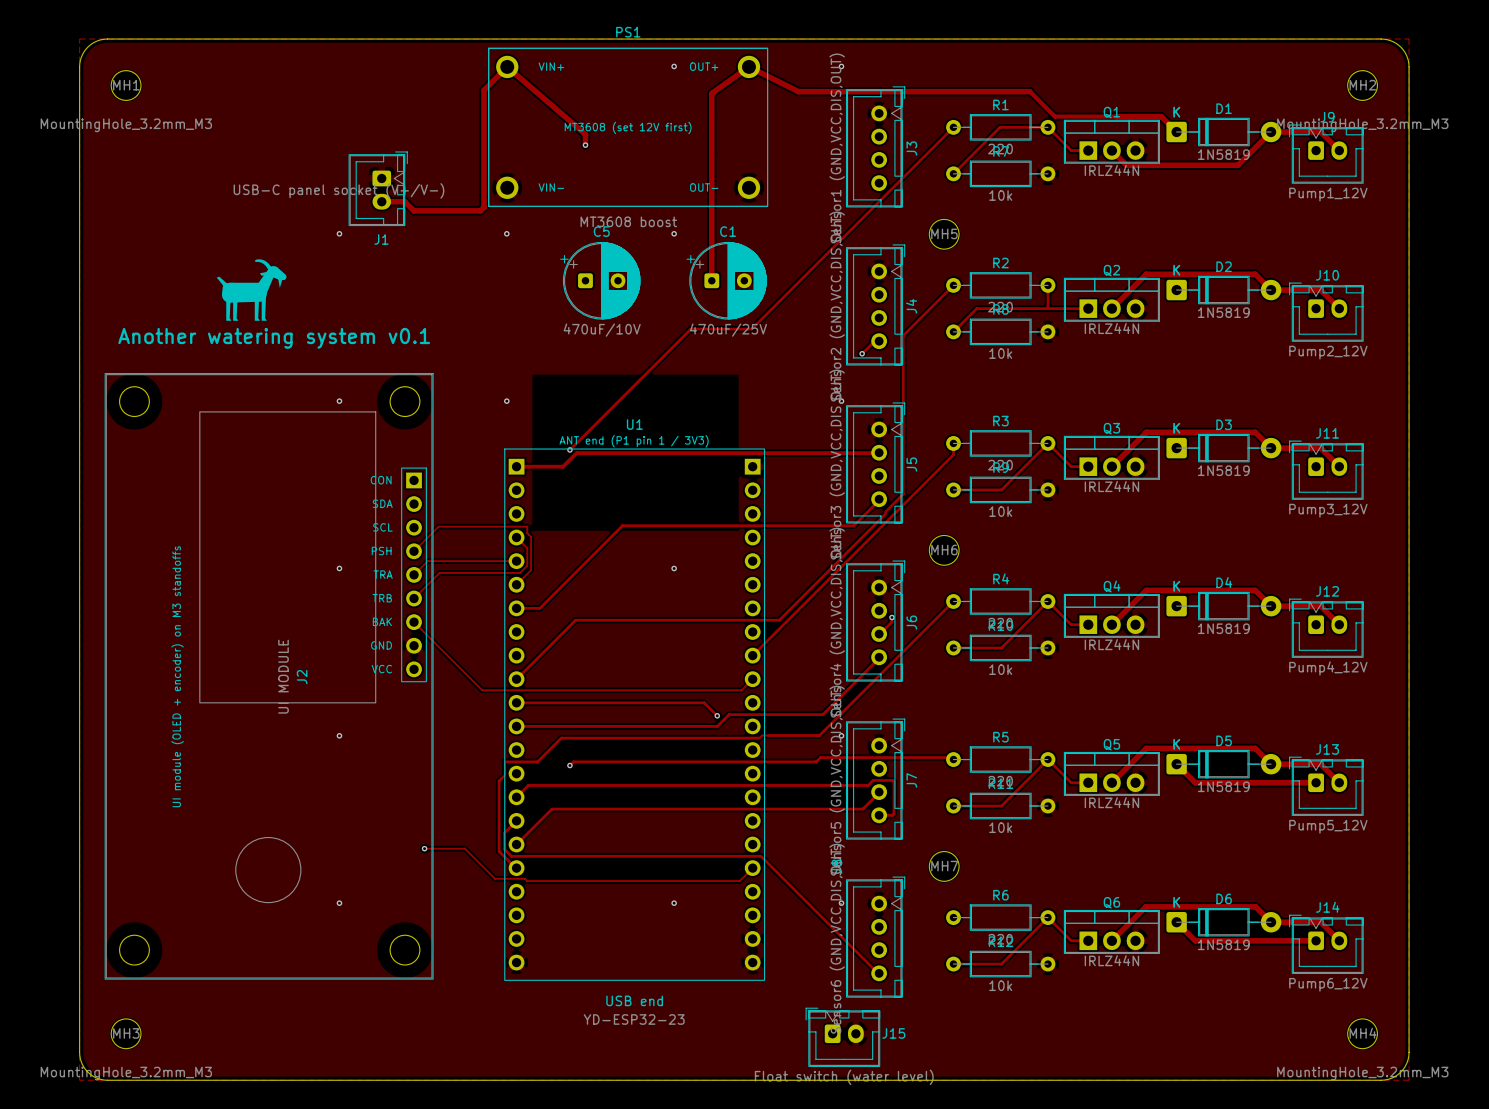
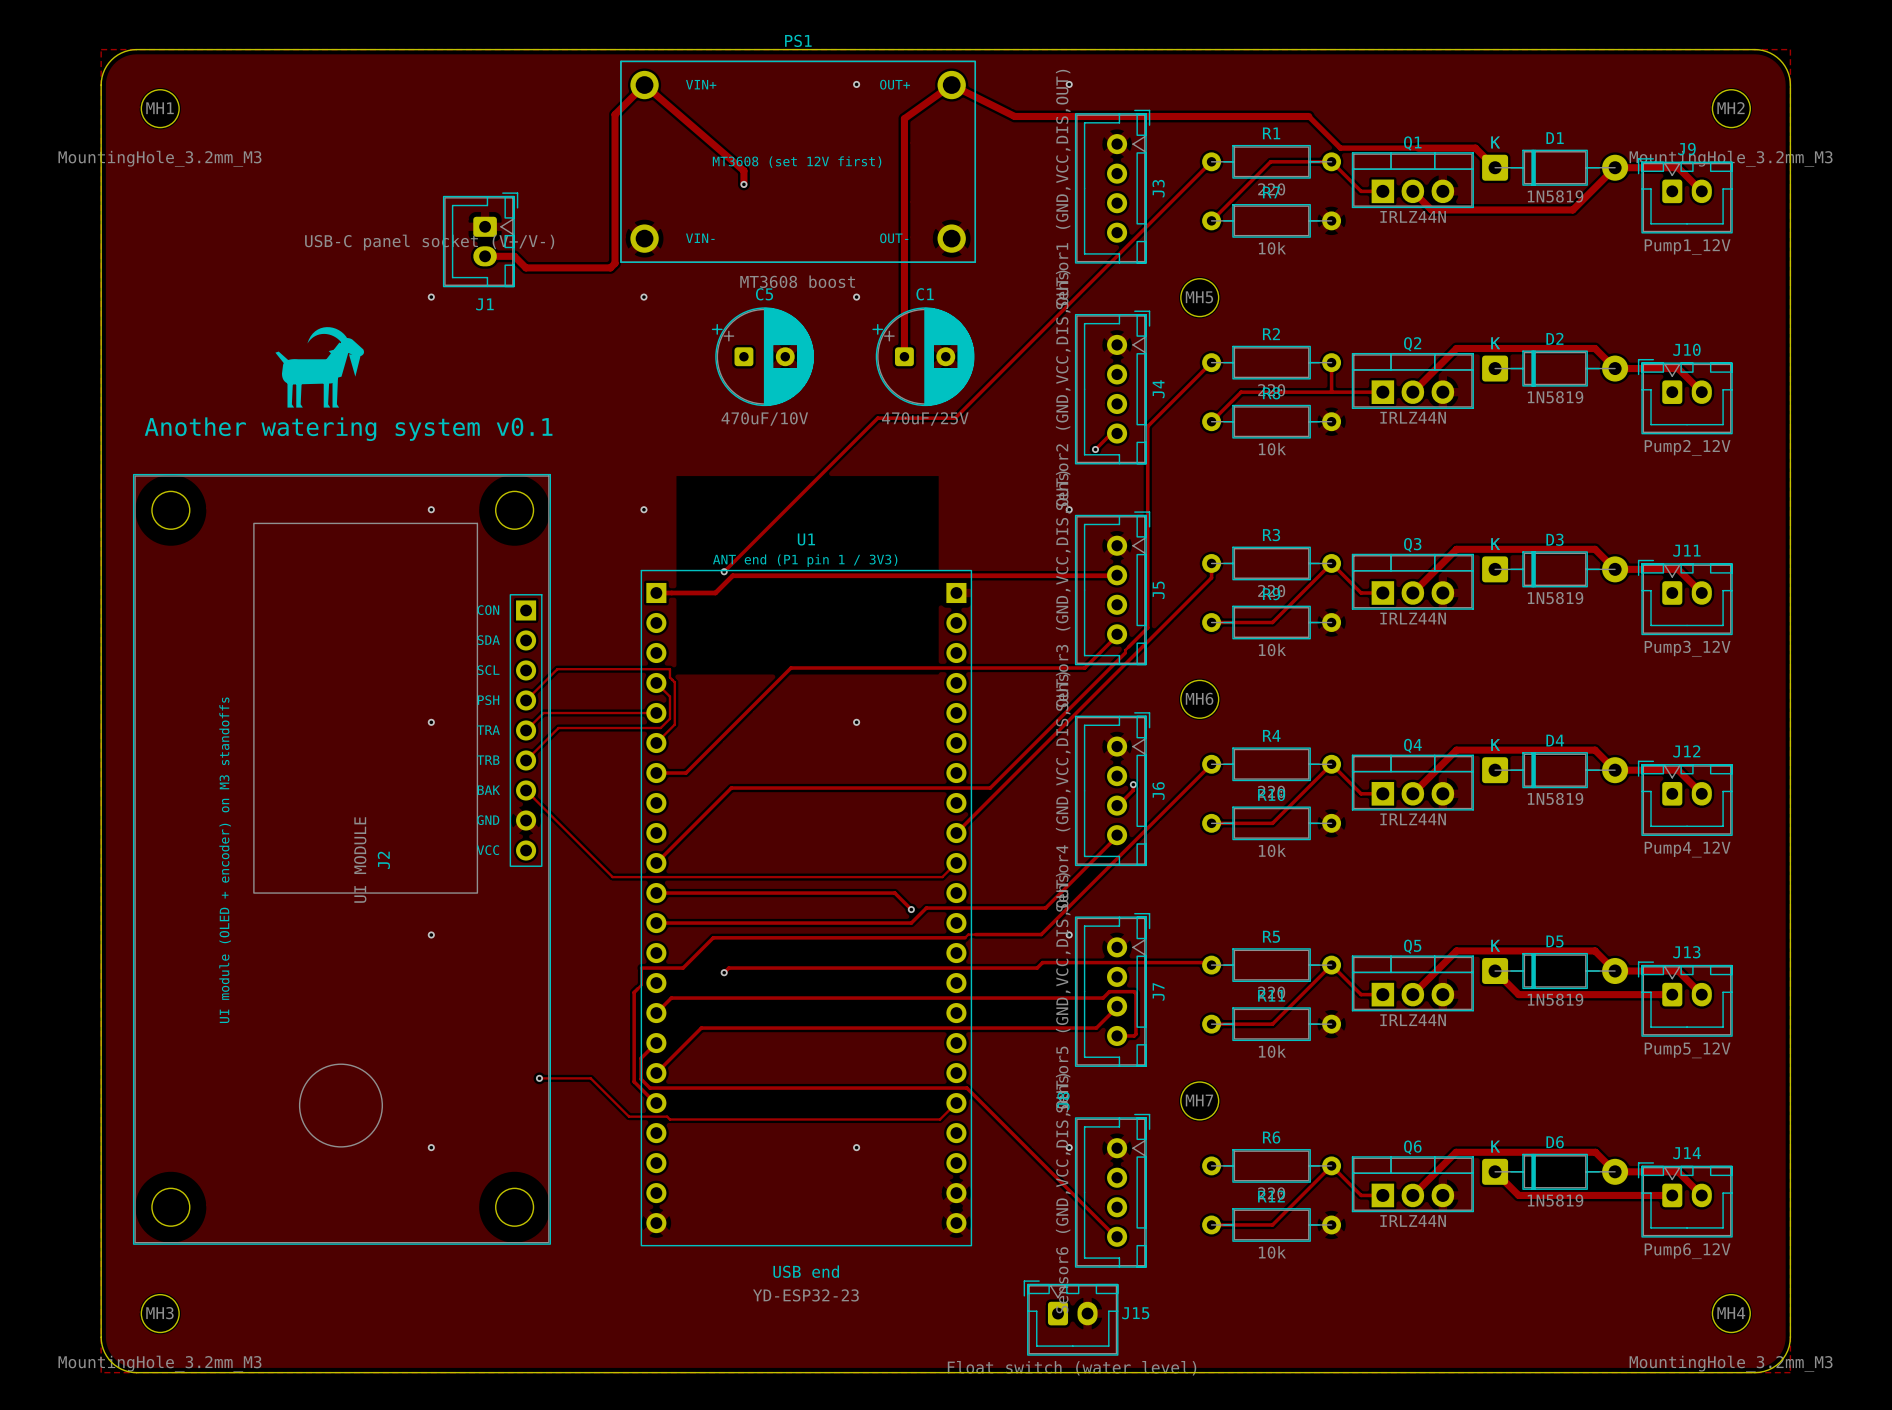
drawing shape: [255, 259, 272, 269] -> [307, 327, 348, 344]
drawing: [257, 268, 276, 294] -> none
drawing: none -> [324, 342, 351, 379]
drawing shape: [278, 278, 283, 288] -> [348, 354, 361, 377]

